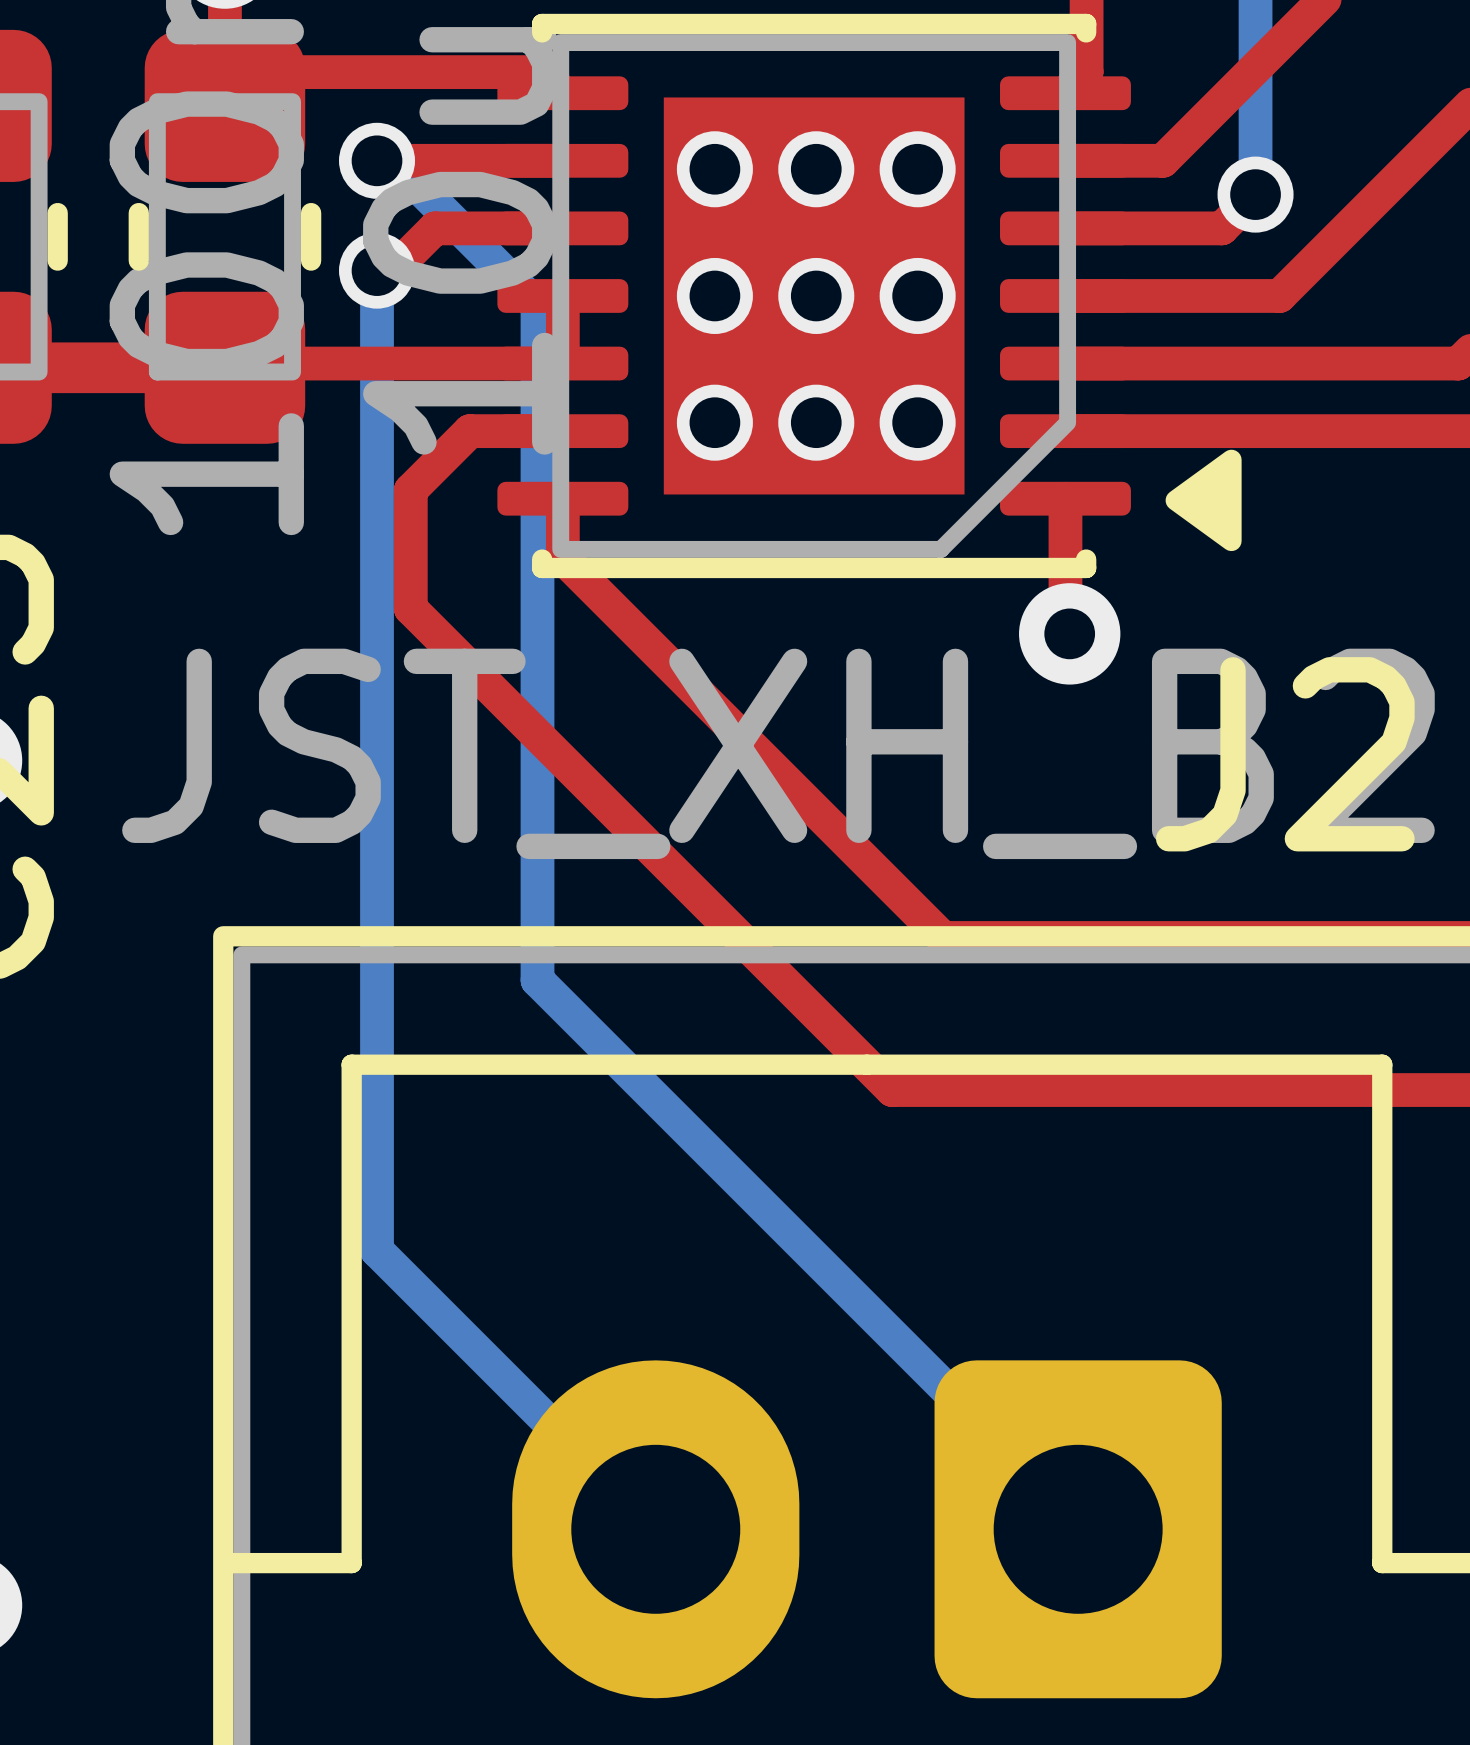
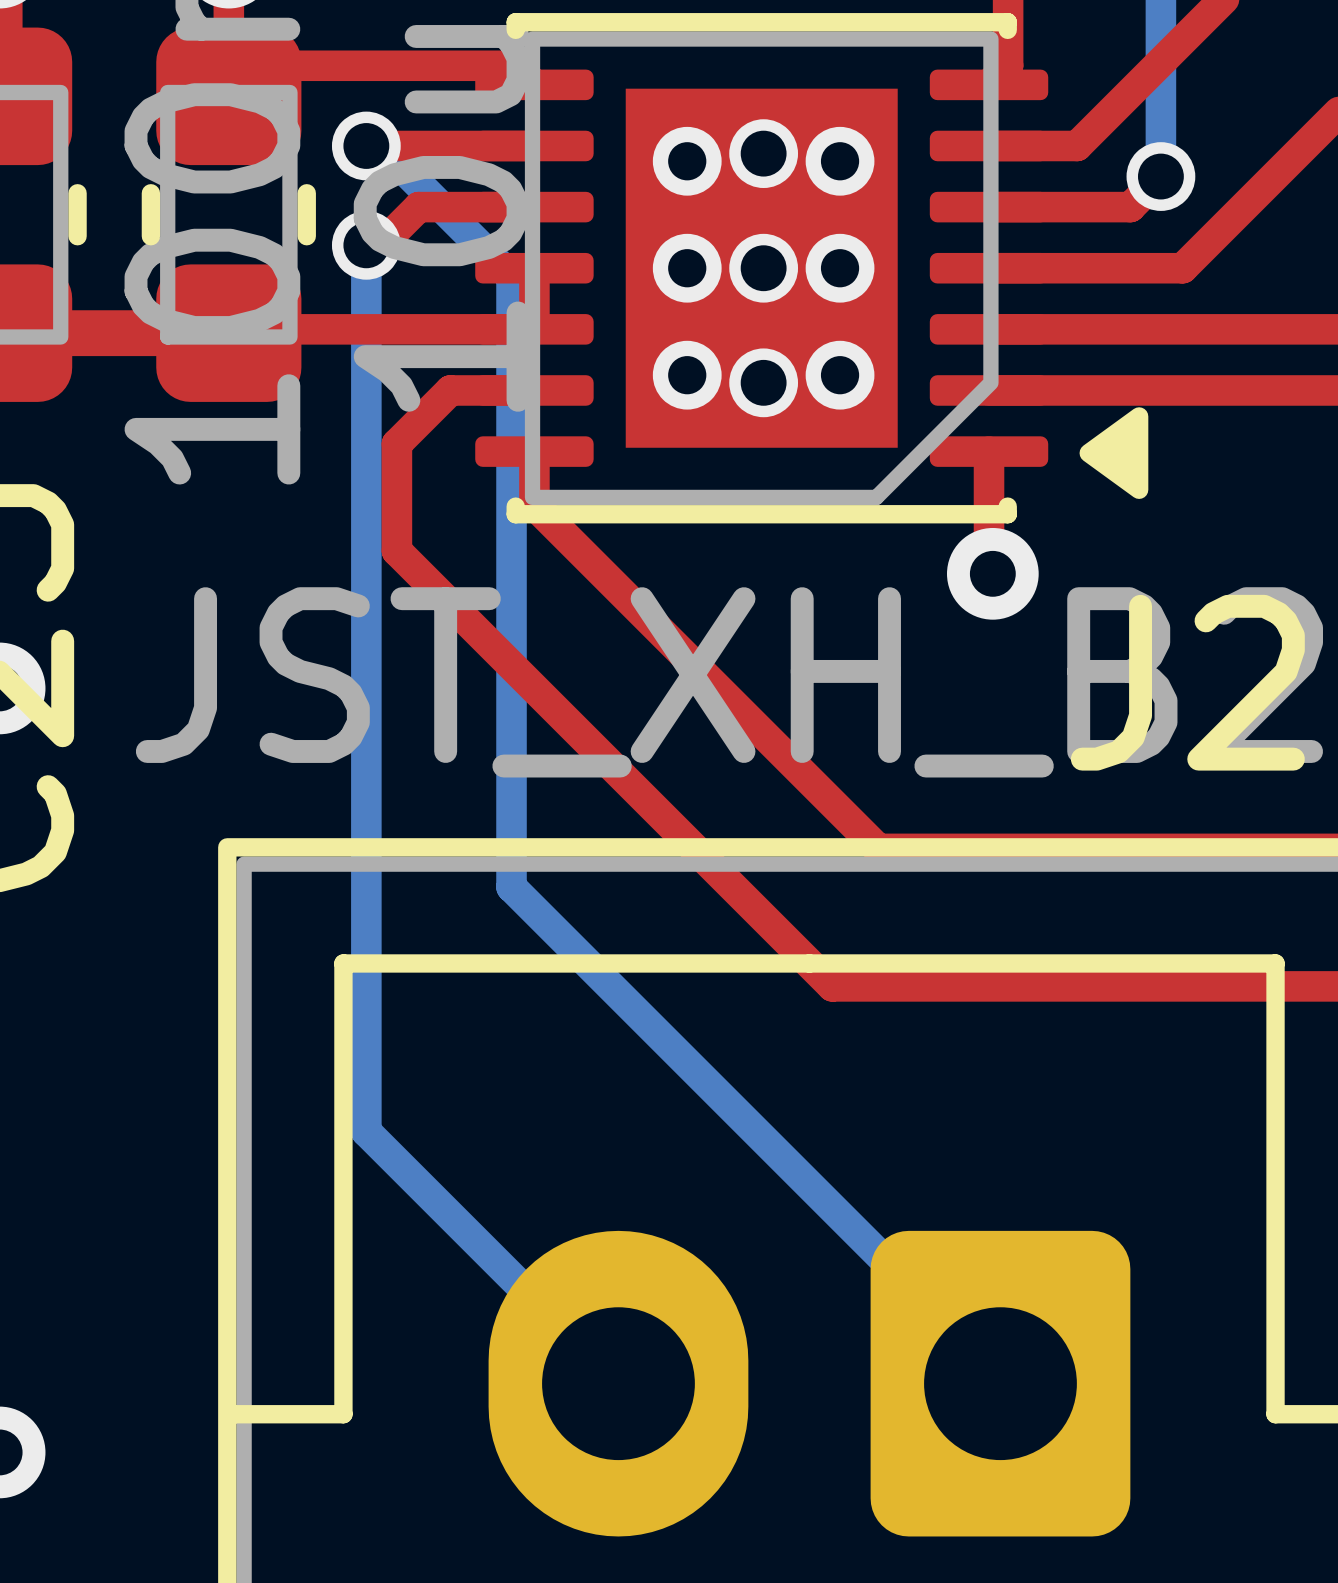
via position: (714, 169) -> (687, 161)
via position: (917, 169) -> (840, 161)
via position: (714, 295) -> (687, 268)
via position: (917, 295) -> (840, 268)
via position: (714, 422) -> (687, 375)
via position: (917, 422) -> (840, 375)

